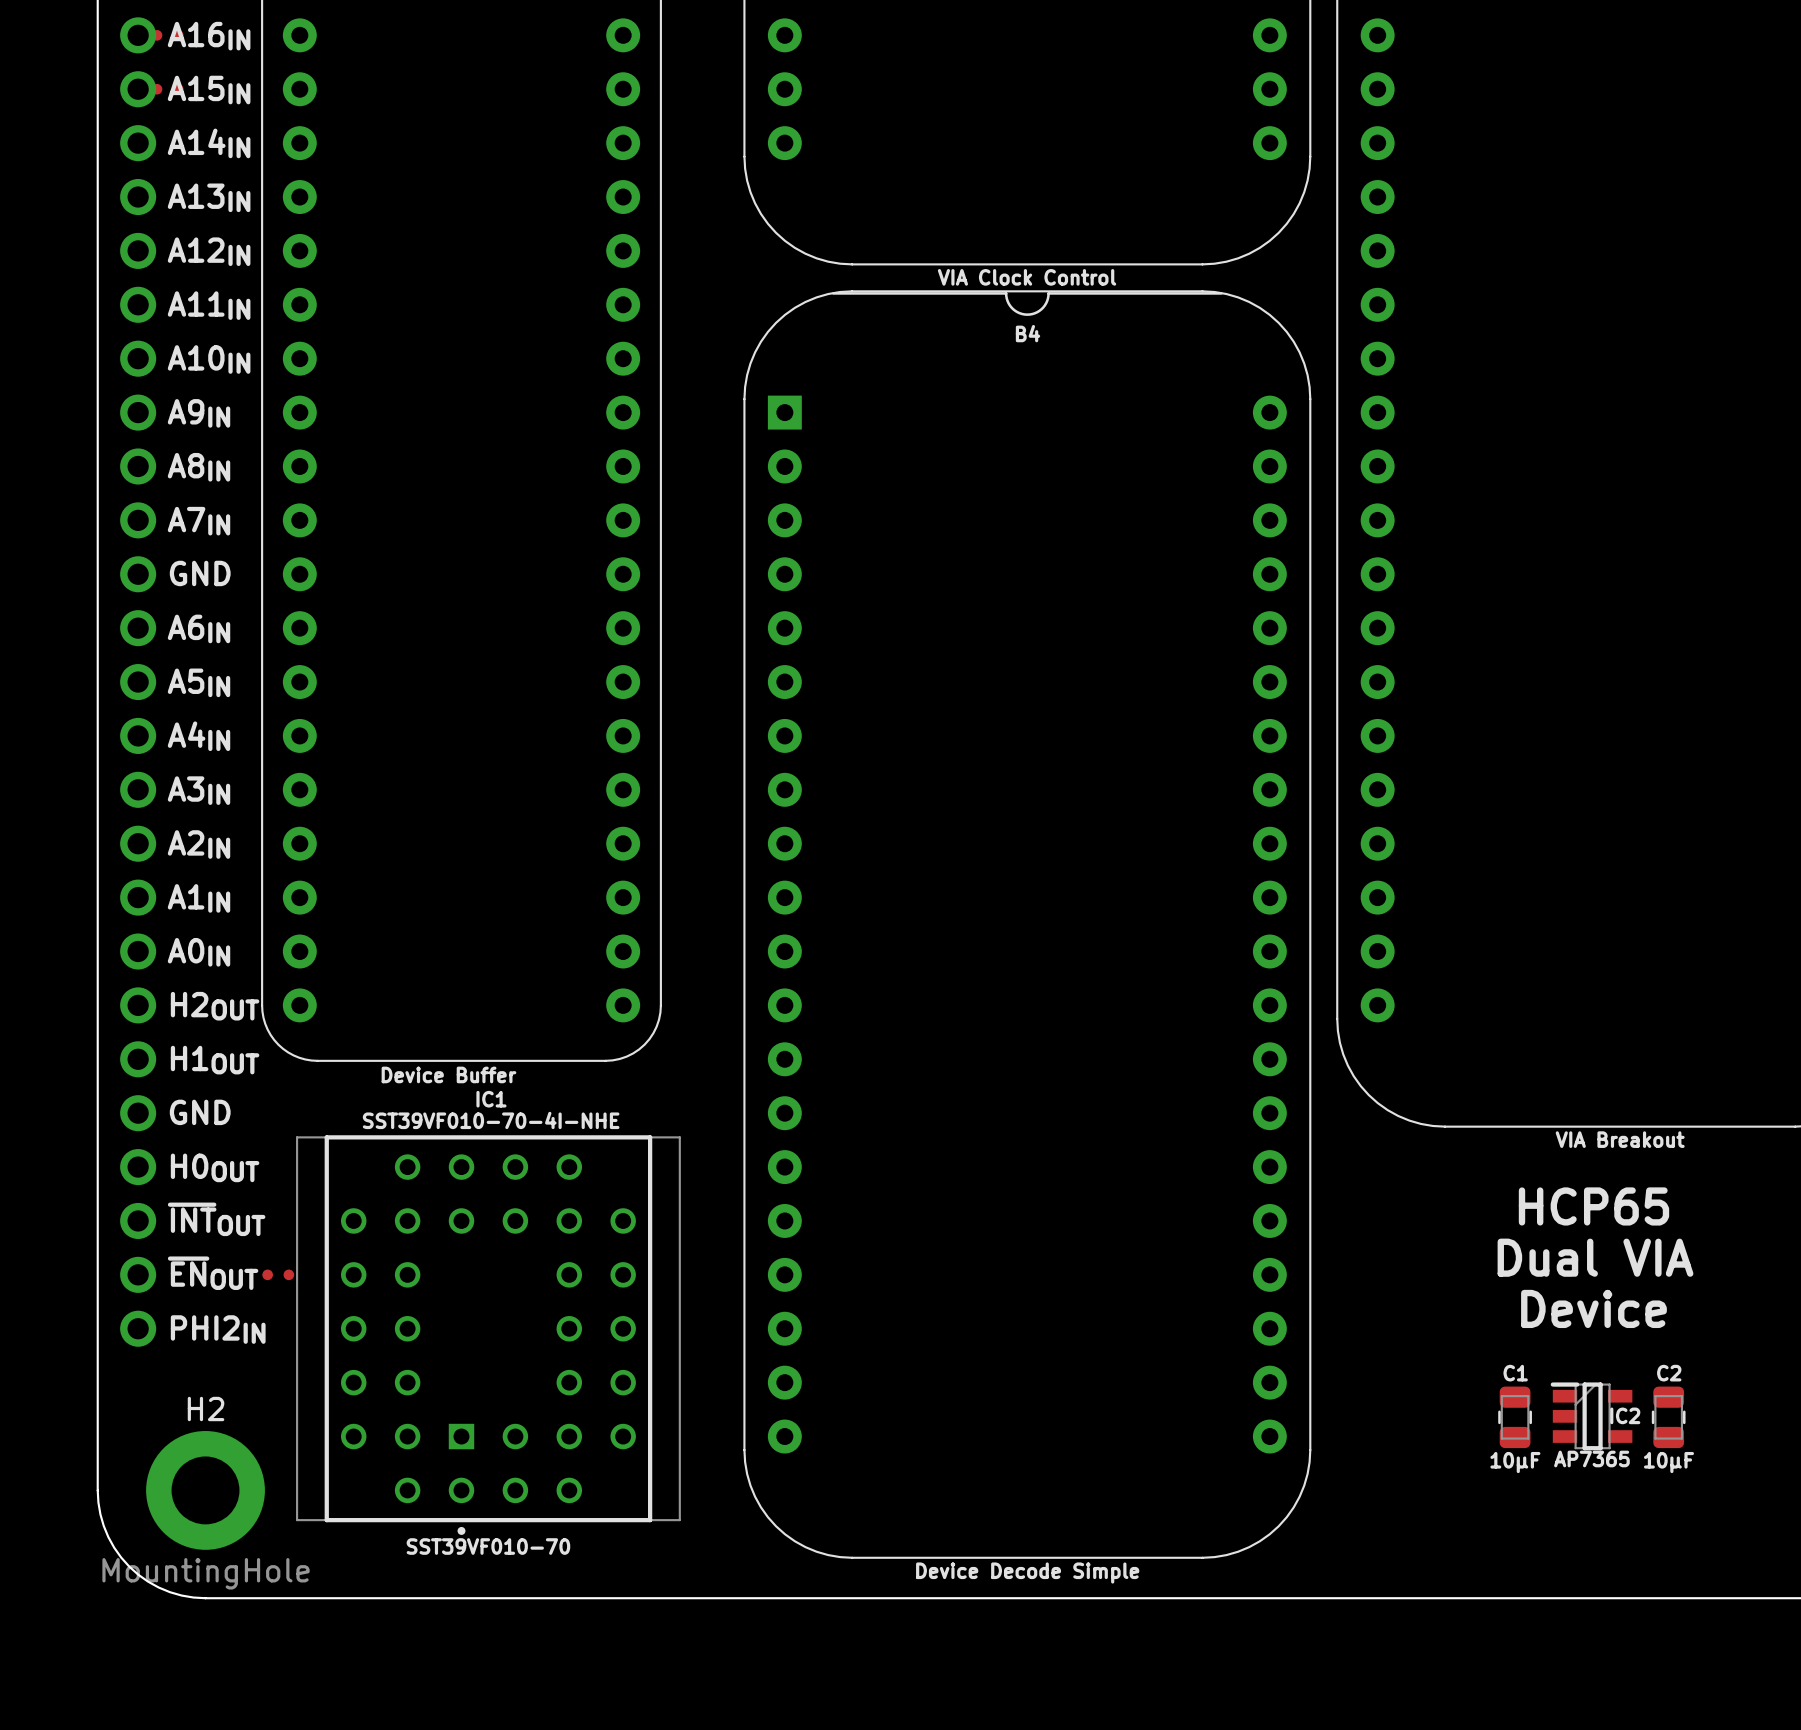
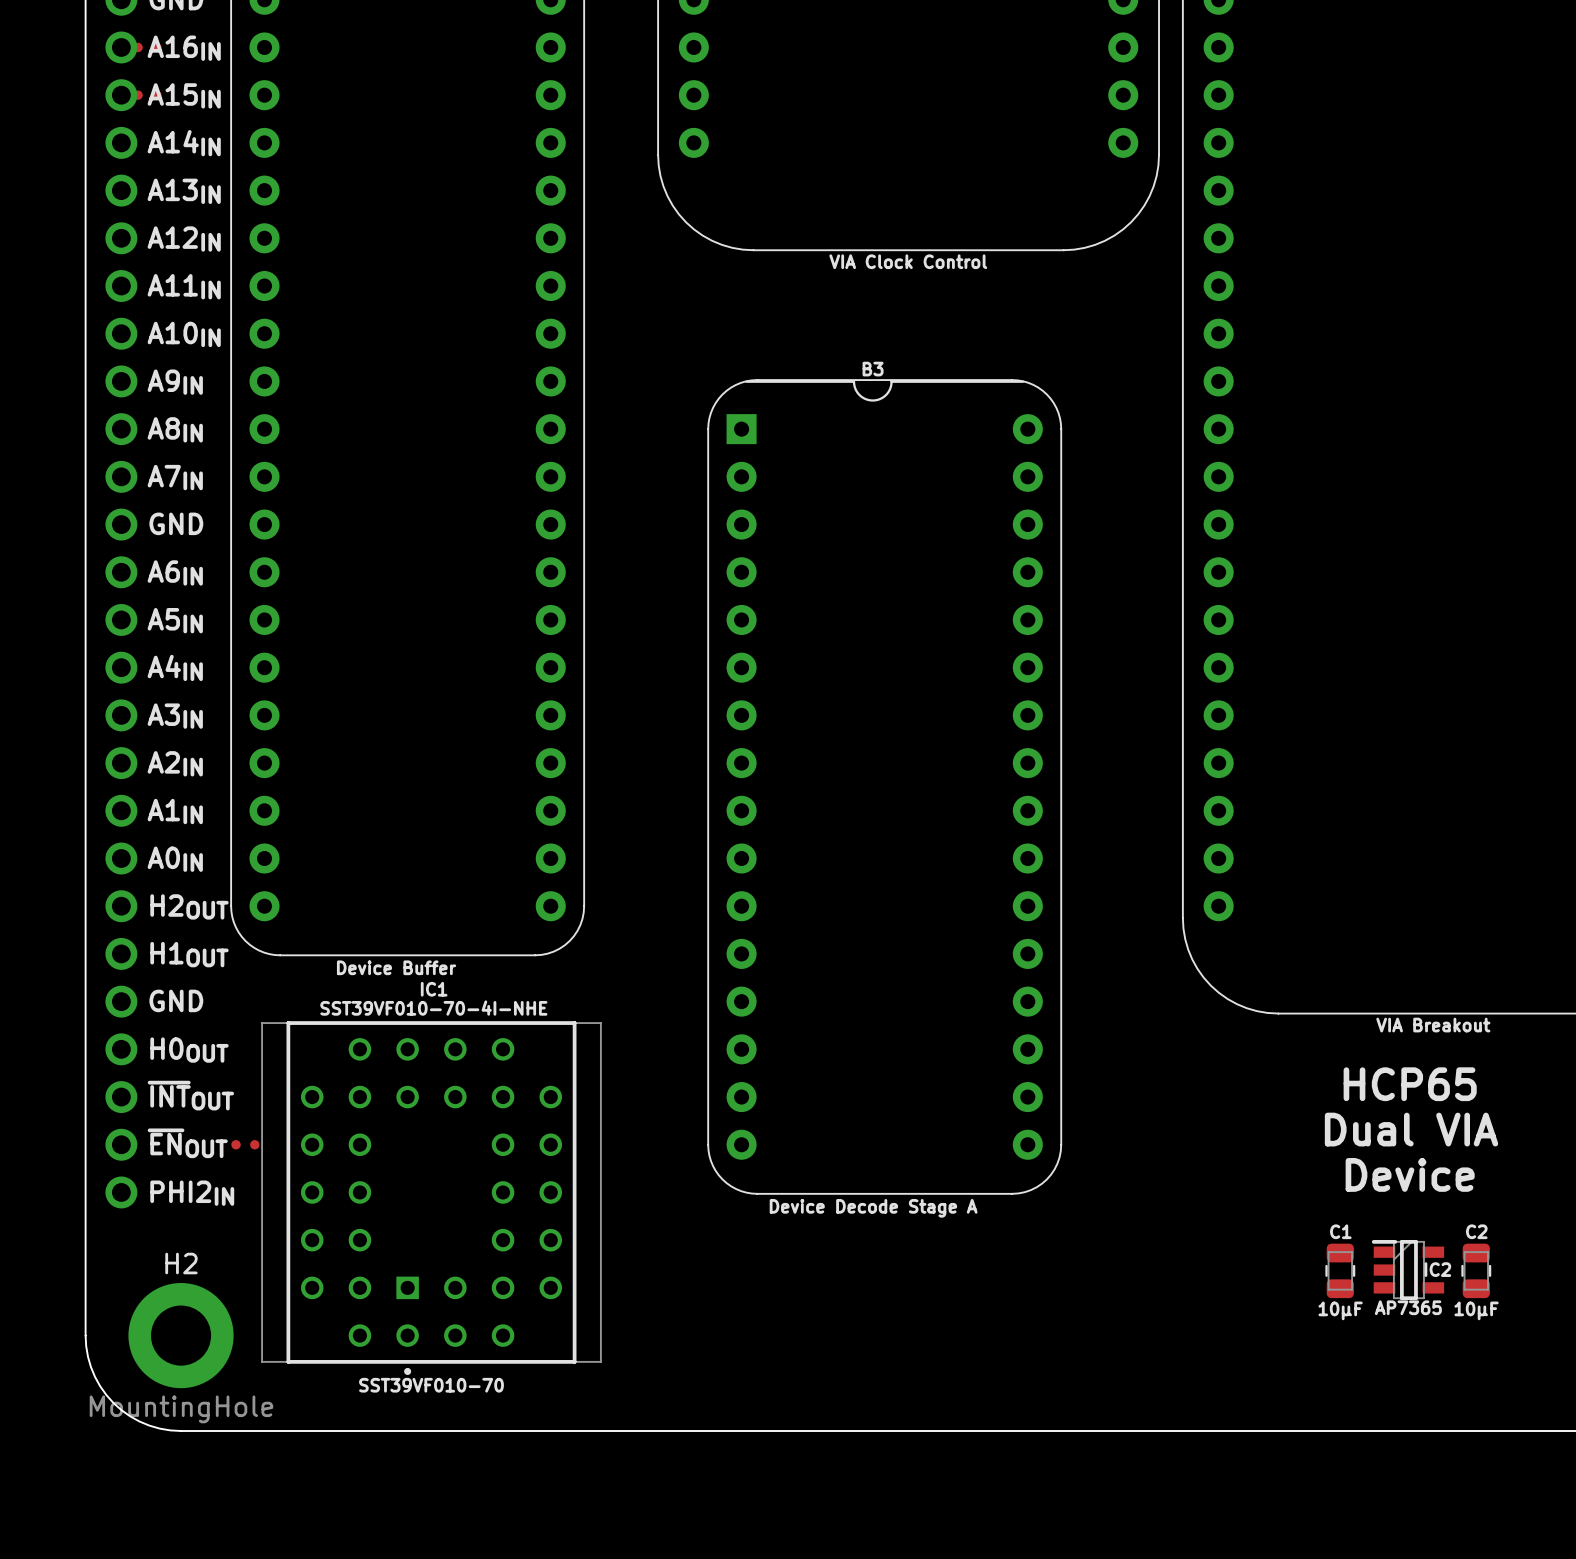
B3: none -> (884, 786)
B4: (1027, 924) -> none

